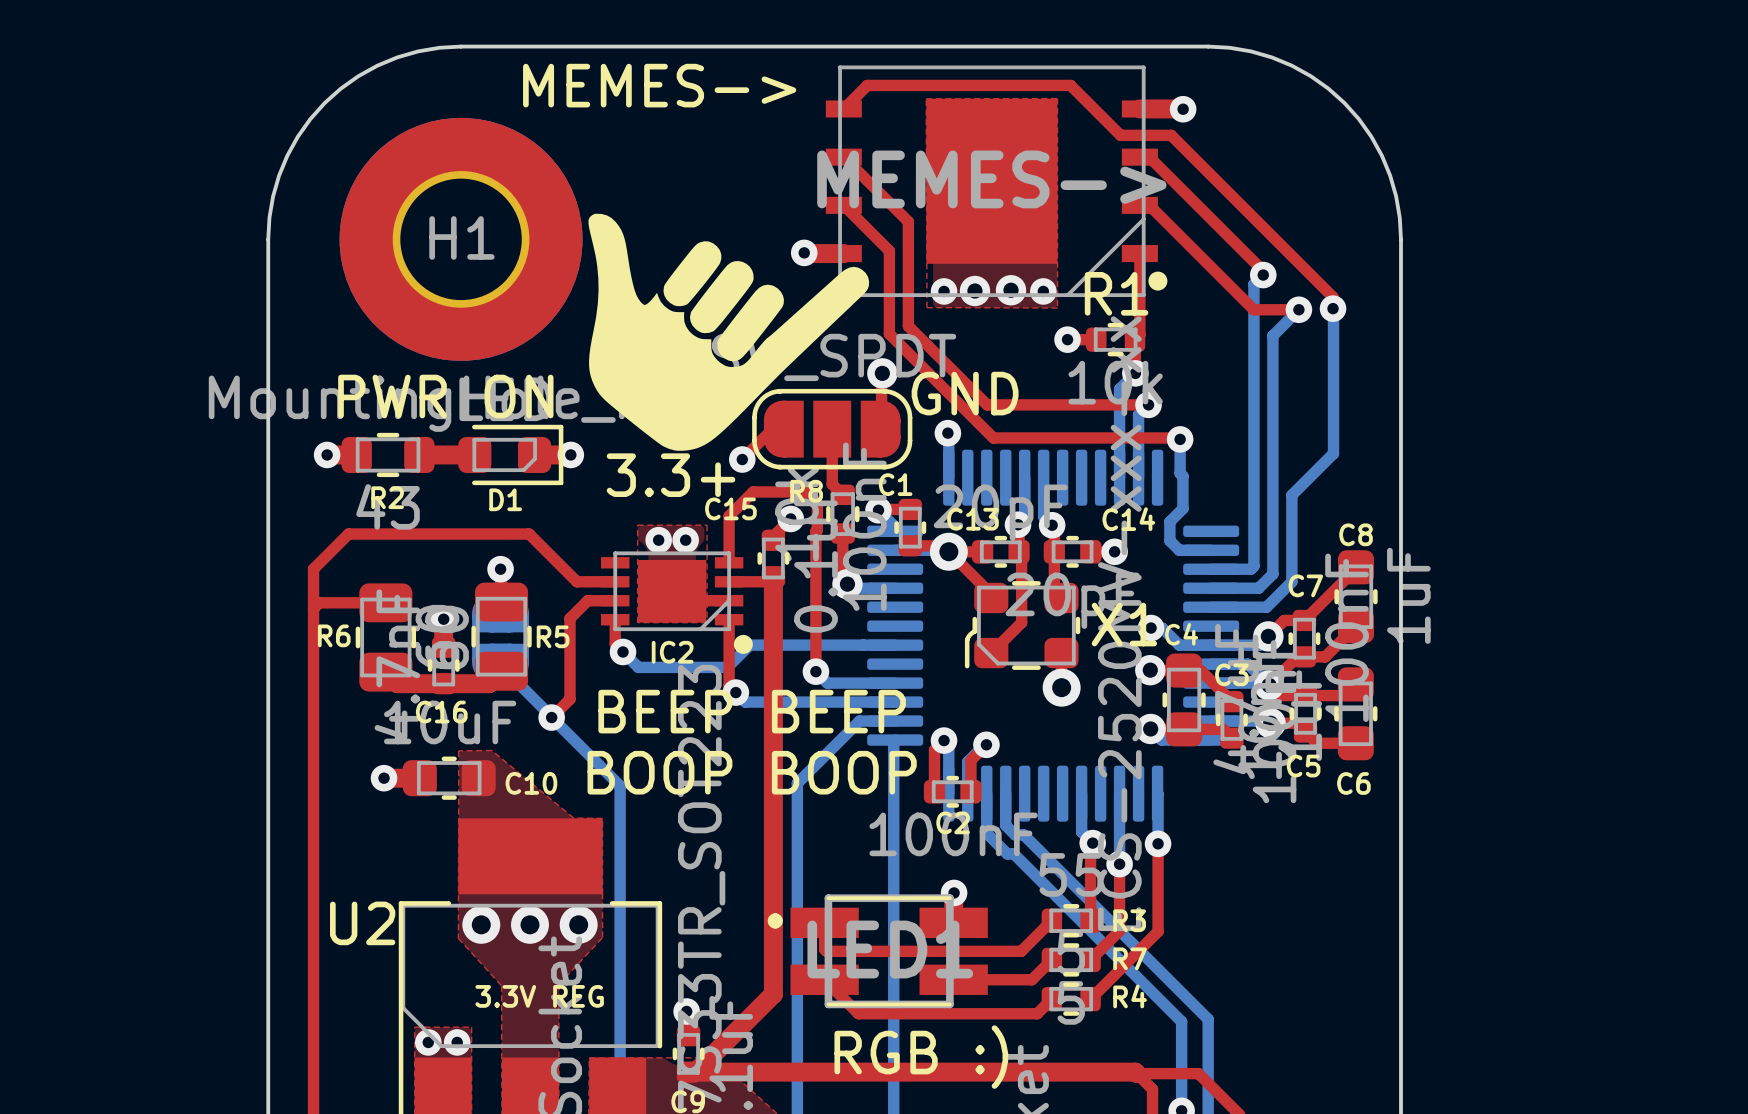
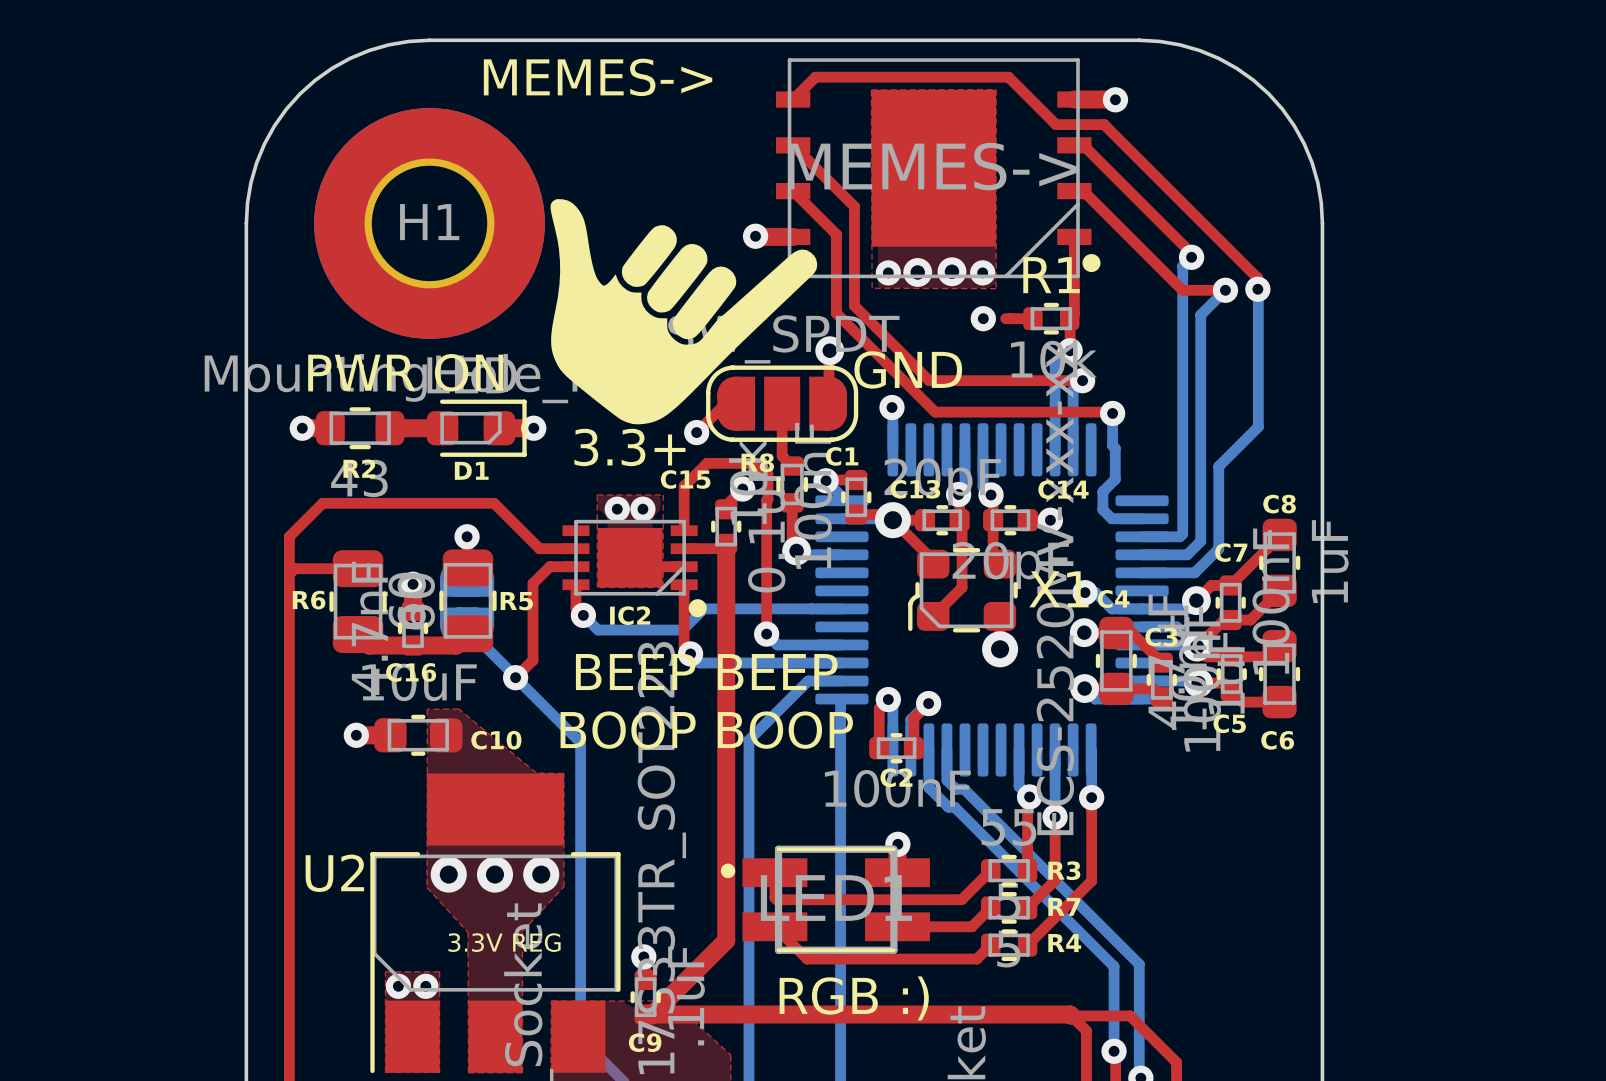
via position: (1067, 339) -> (983, 318)

